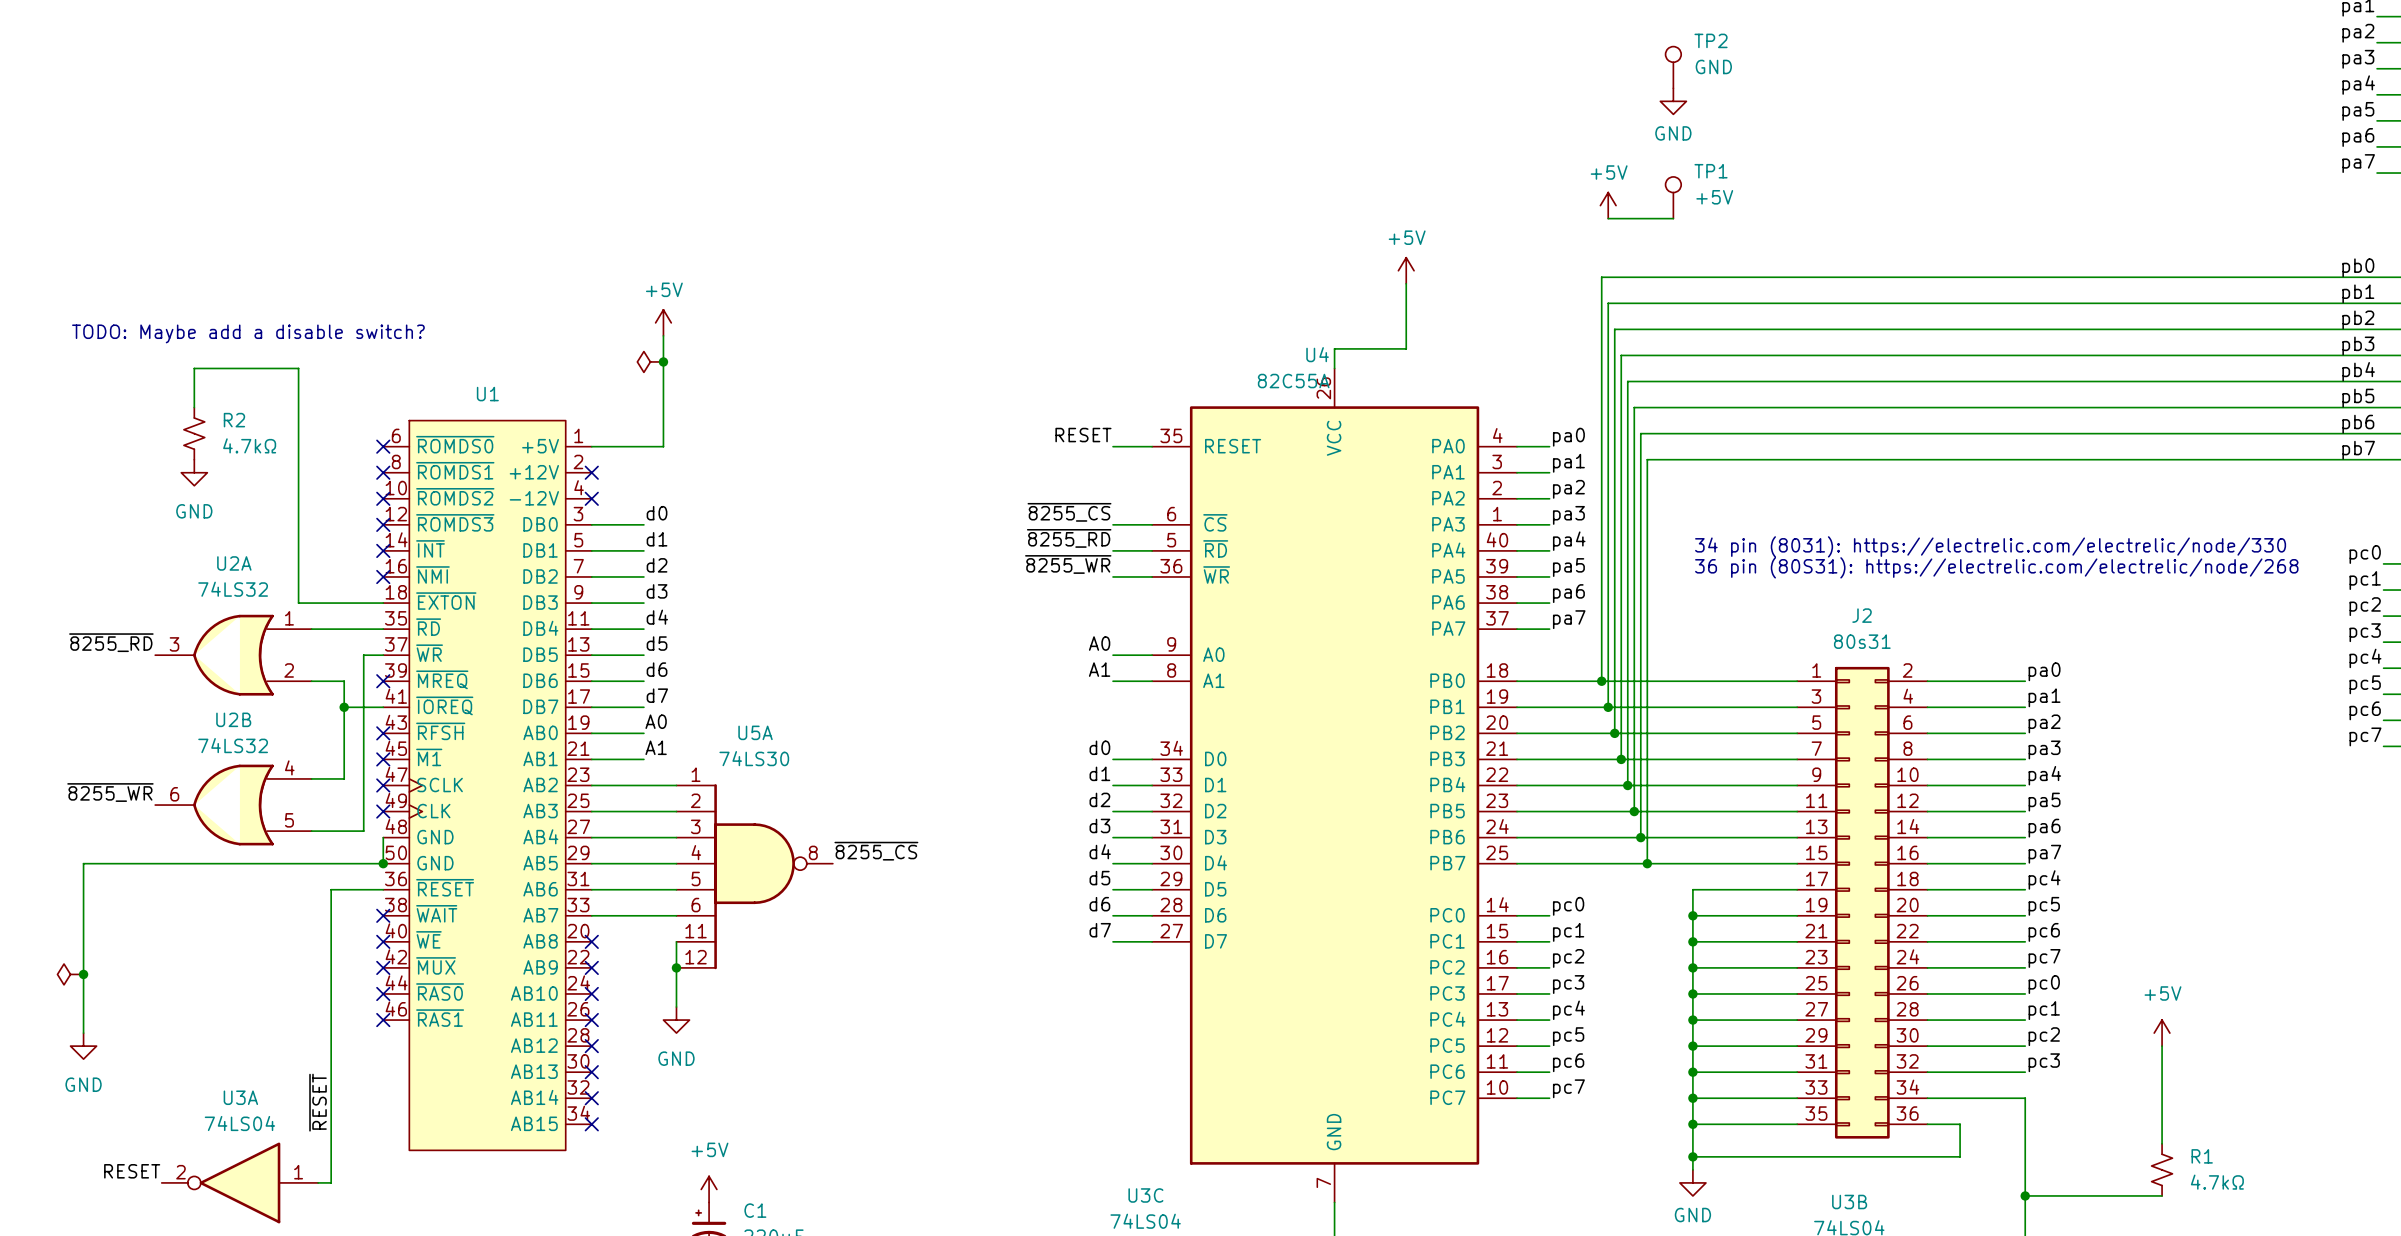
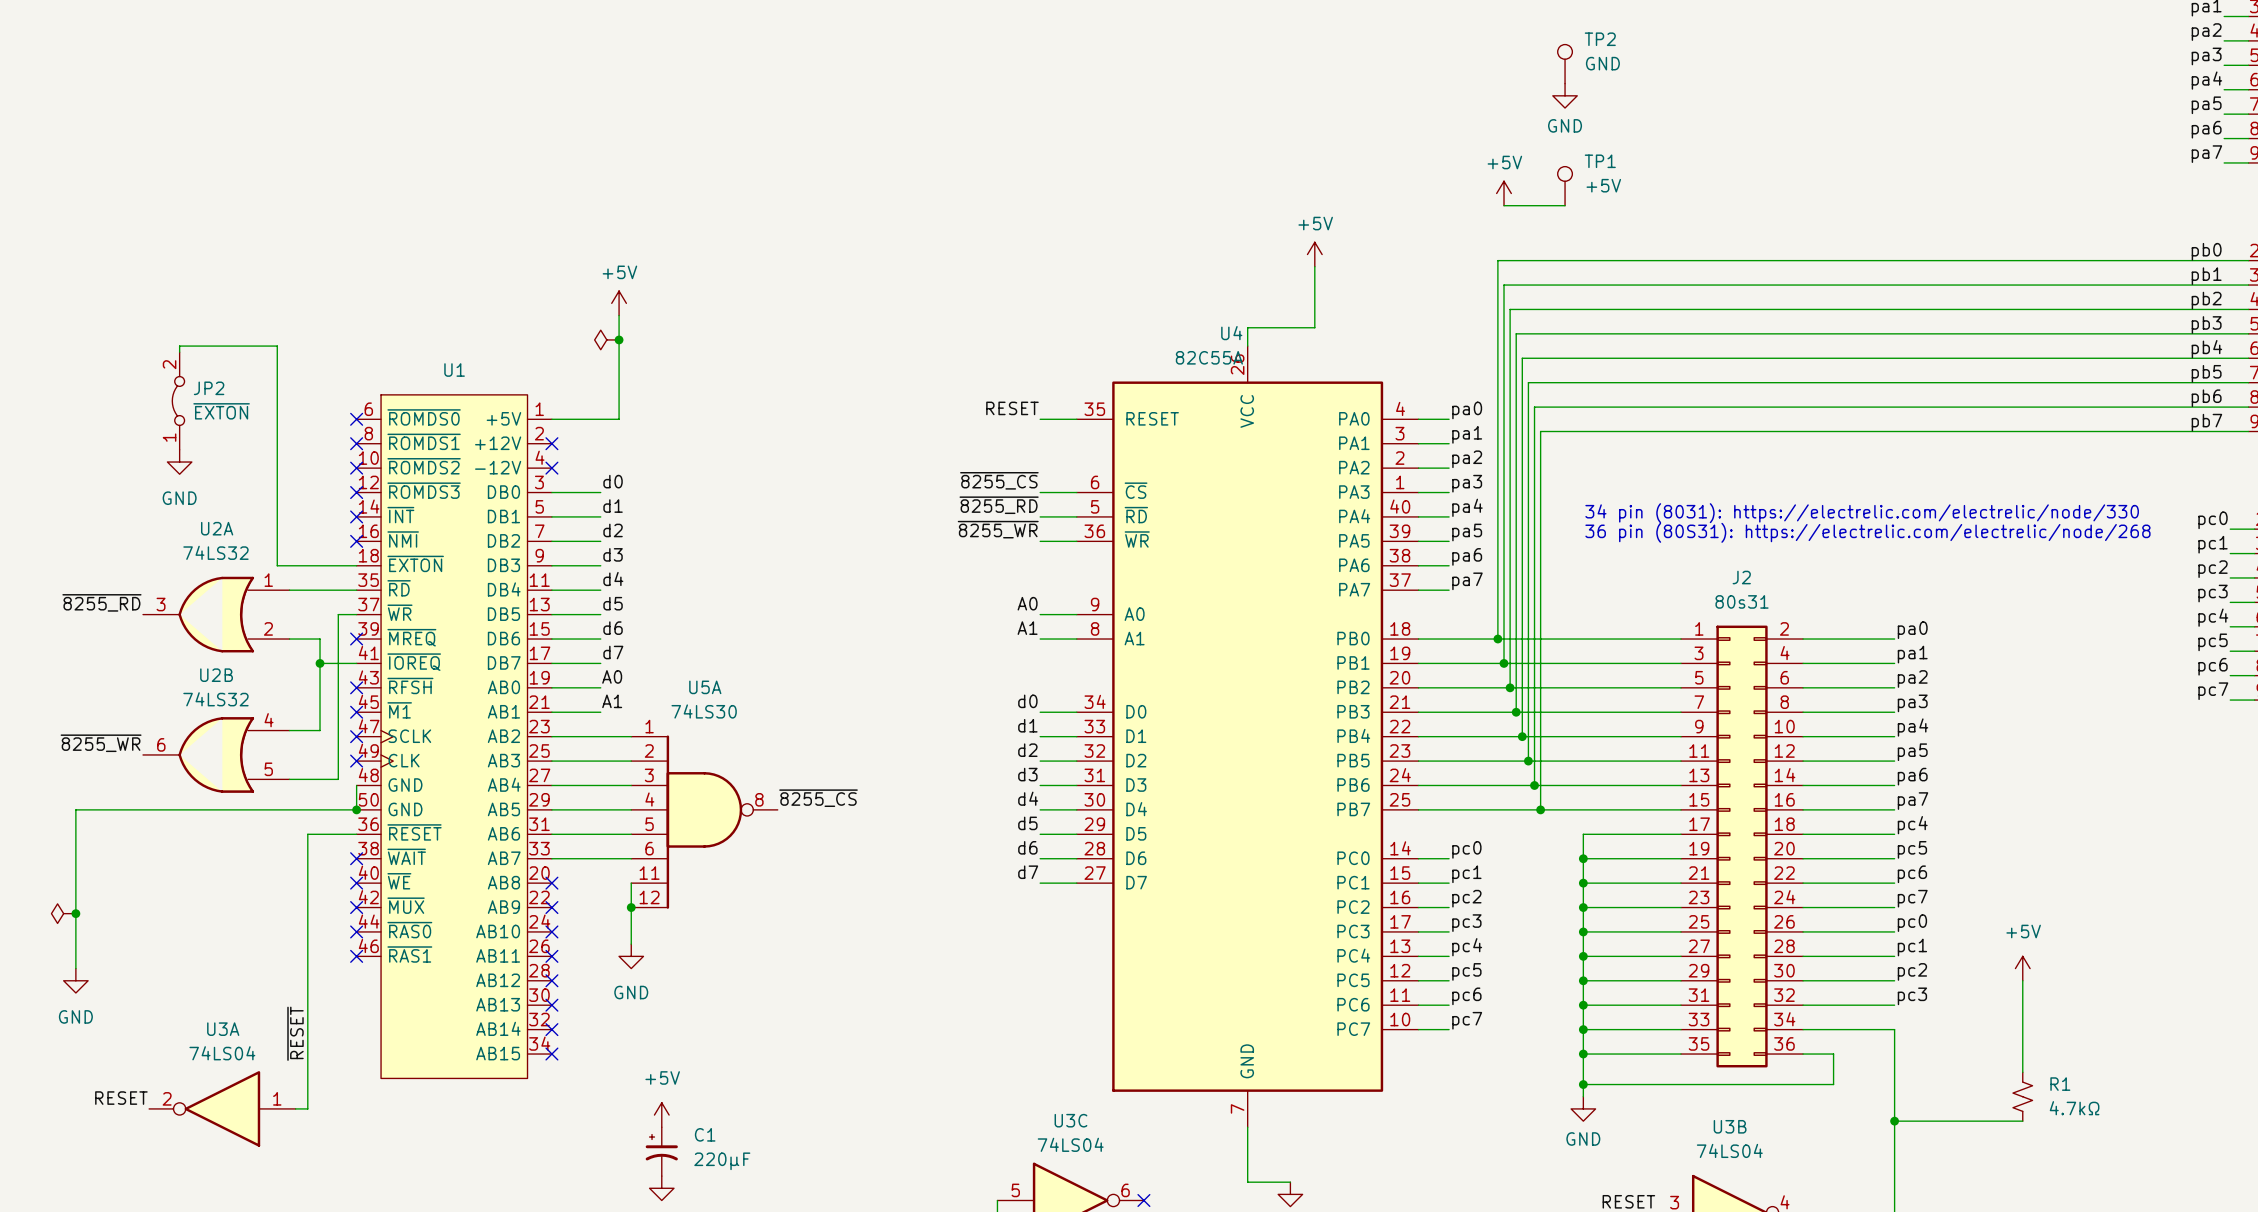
text: TODO: Maybe add a disable switch? (248, 333) -> none
JP2: none -> ~{EXTON} (178, 400)
R2: 4.7kΩ (194, 433) -> none
power symbol position: GND (194, 472) -> GND (179, 462)

